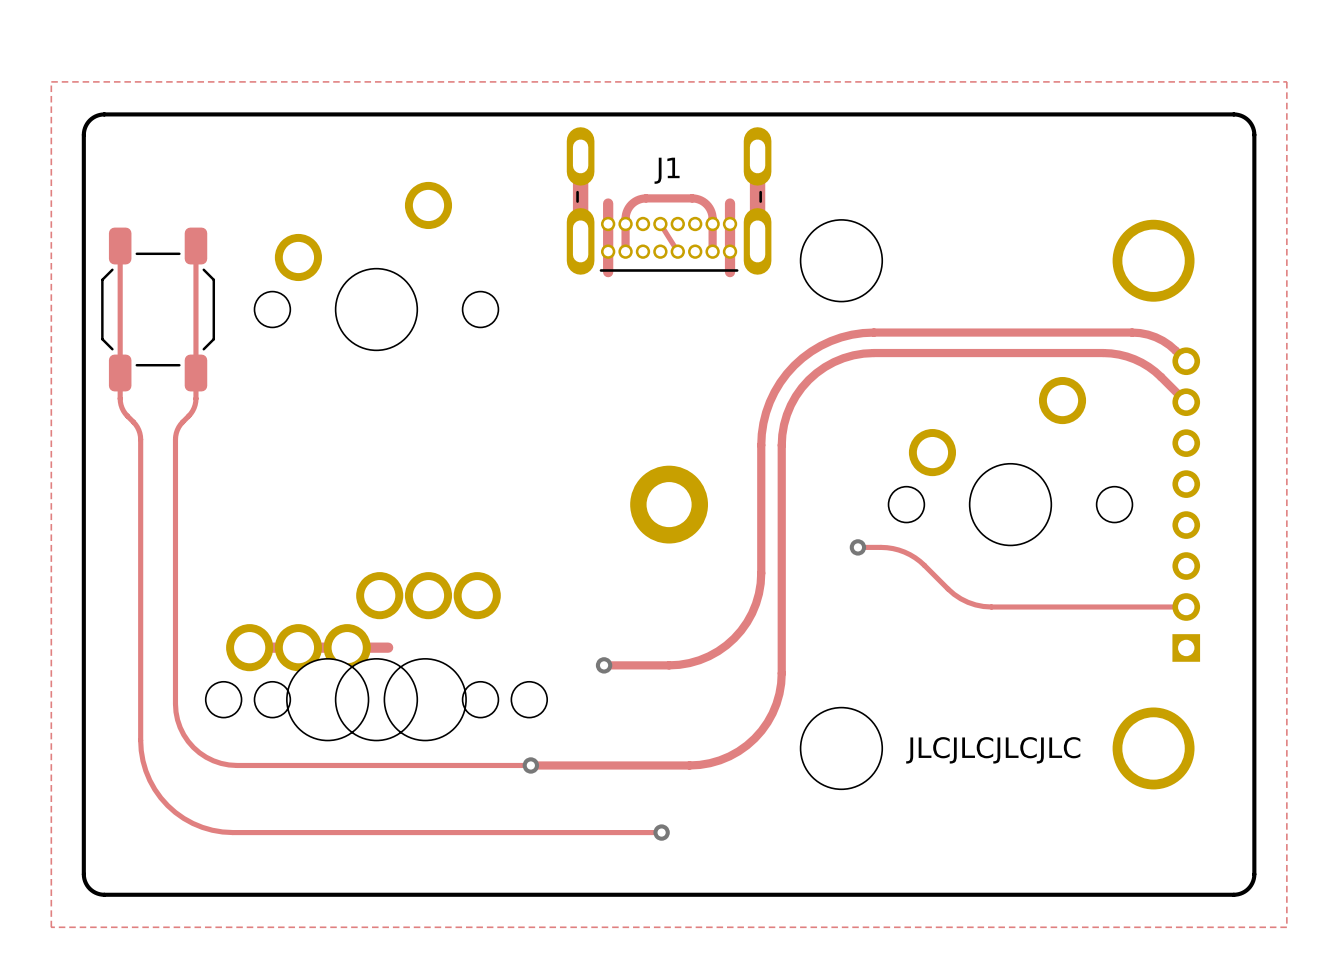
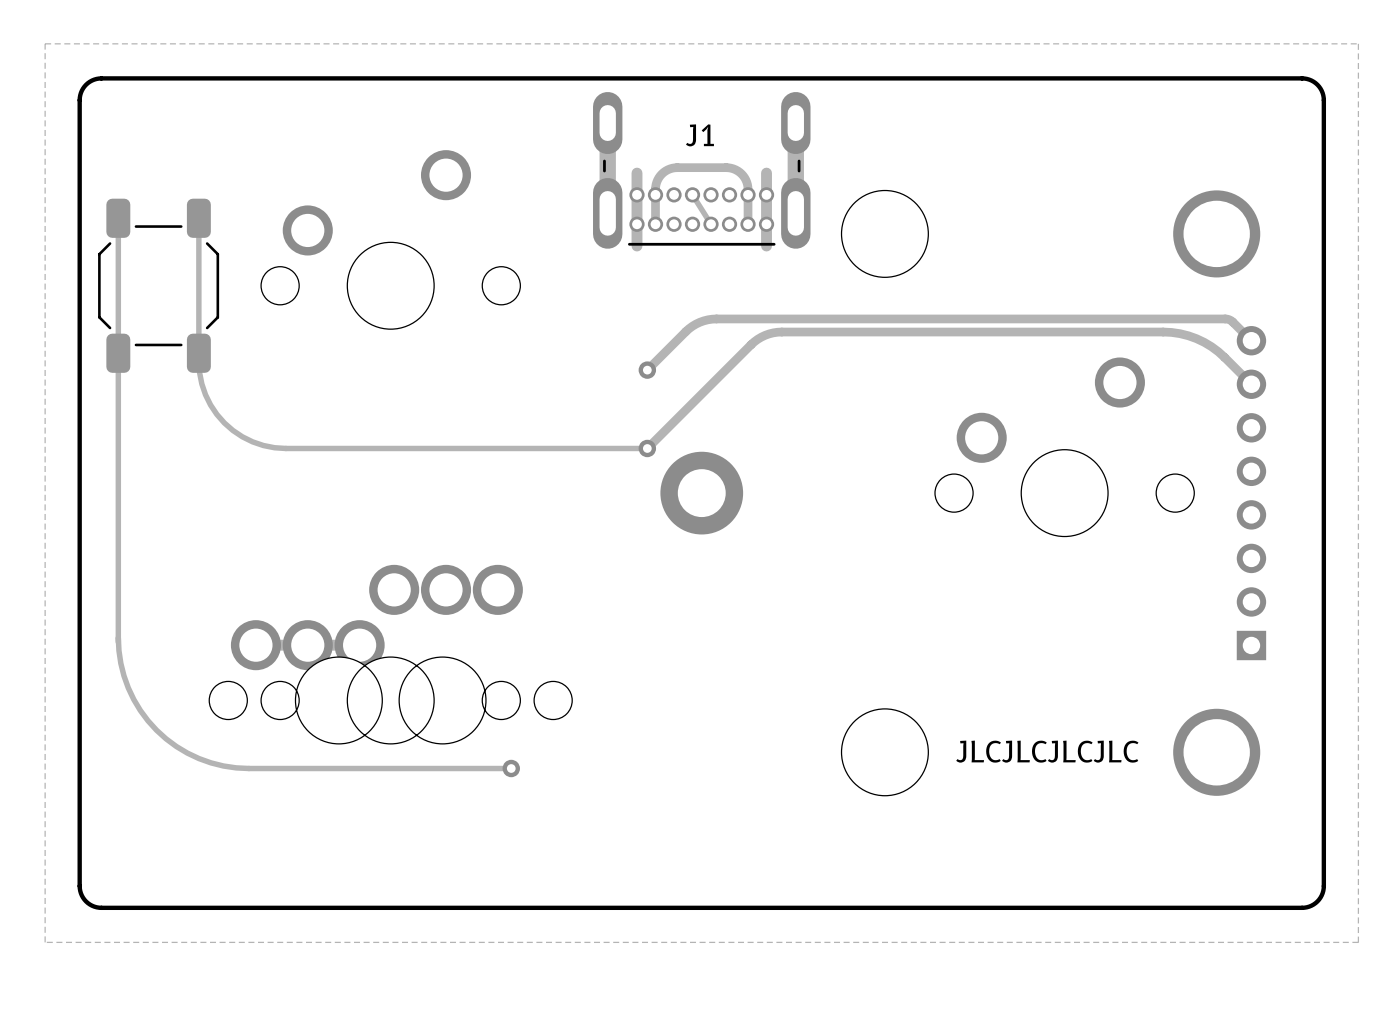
track: (1175, 350) (1155, 337) (1132, 332) (873, 332) (841, 337) (820, 345) (802, 358) (786, 373) (774, 392) (766, 412) (761, 445) (760, 583) (756, 603) (747, 622) (726, 645) (699, 660) (669, 665) (604, 665) -> (1240, 329) (1231, 320) (1225, 318) (712, 319) (699, 322) (688, 328) (647, 370)
track: (873, 353) (843, 358) (816, 373) (795, 396) (784, 424) (781, 445) (781, 673) (779, 693) (772, 713) (761, 730) (738, 751) (720, 760) (689, 765) (236, 765) (221, 763) (199, 752) (183, 734) (177, 719) (175, 704) (175, 439) (178, 427) (190, 413) (195, 405) (195, 373) -> (919, 332) (781, 332) (765, 335) (751, 344) (647, 448) (274, 447) (242, 436) (216, 414) (201, 383) (198, 361)
via: none -> (647, 370)
track: (120, 398) (123, 410) (137, 427) (140, 439) (141, 750) (145, 770) (154, 789) (175, 812) (202, 827) (232, 832) (661, 832) -> (118, 380) (118, 642)
via: none -> (647, 448)
track: (857, 547) (887, 547) (904, 552) (919, 561) (954, 594) (967, 602) (983, 606) (1186, 607) -> none
via: (857, 547) -> none
track: none -> (118, 637) (120, 663) (128, 687) (147, 720) (176, 746) (211, 762) (248, 768) (511, 768)
track: (347, 647) (388, 647) -> none
via: (604, 665) -> none
via position: (530, 765) -> (511, 768)
via: (661, 832) -> none

